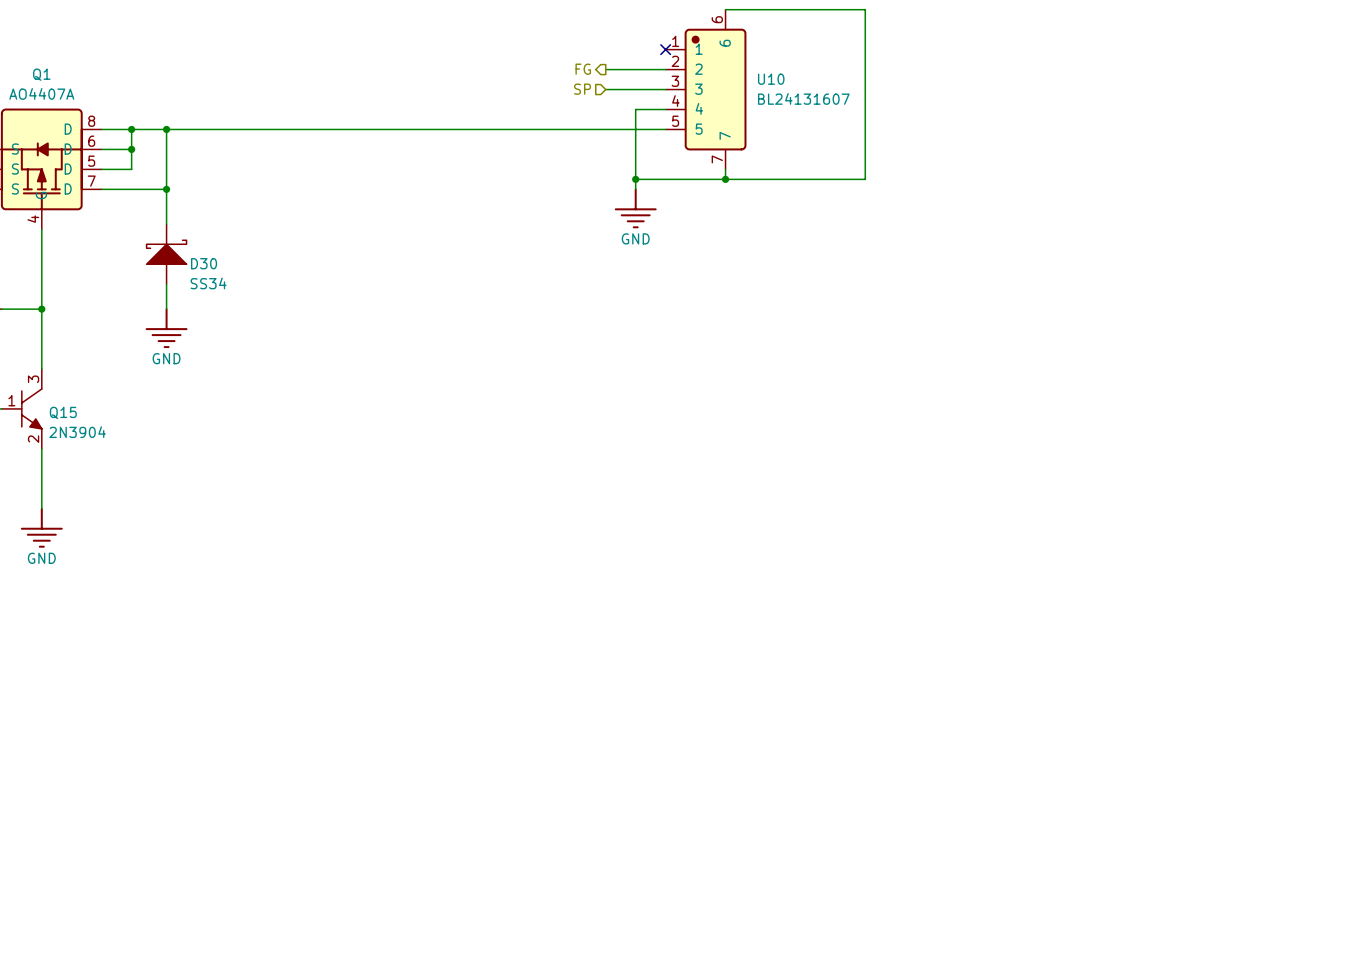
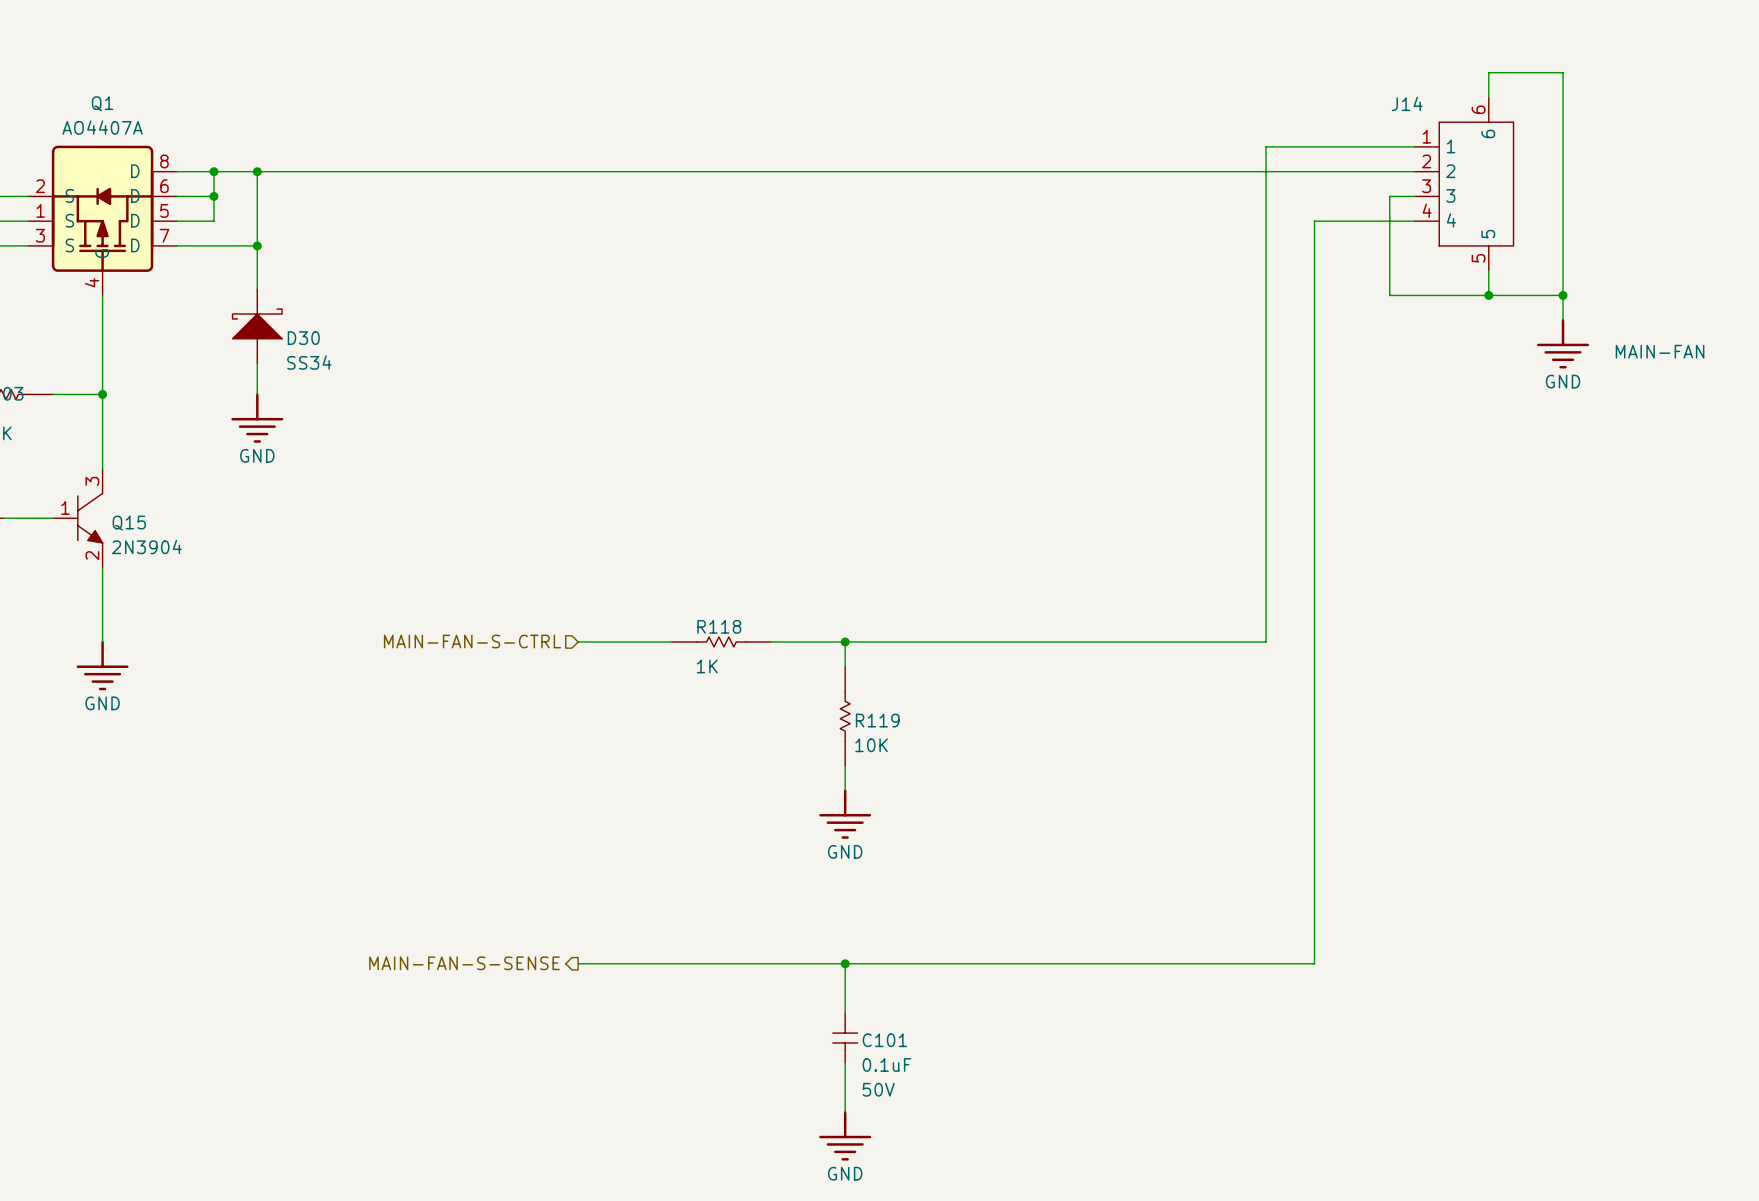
wire: (725, 9) (865, 9) (865, 179) (635, 179) -> none
no-connect mark: (665, 49) -> none
hierarchical label: FG (583, 69) -> none
wire: (605, 69) (665, 69) -> none
wire: none -> (1488, 97) (1488, 72) (1563, 72) (1563, 320)
hierarchical label: SP (582, 89) -> none
wire: (605, 89) (665, 89) -> none
U10: BL24131607 (706, 89) -> none
wire: (665, 109) (635, 109) (635, 189) -> none
wire: none -> (1414, 146) (1265, 146) (1265, 641) (770, 641)
wire: none -> (876, 171) (1414, 171)
J14: none -> MAIN-FAN (1464, 184)
wire: none -> (1414, 196) (1389, 196) (1389, 295) (1563, 295)
wire: (725, 169) (725, 179) -> none
wire: none -> (1414, 221) (1314, 221) (1314, 963) (578, 963)
junction: (635, 179) -> none
junction: (725, 179) -> none
power symbol: GND (635, 208) -> none
wire: none -> (1488, 270) (1488, 295)
junction: none -> (1488, 295)
junction: none -> (1563, 295)
power symbol: none -> GND (1563, 343)
hierarchical label: none -> MAIN-FAN-S-CTRL (472, 641)
wire: none -> (578, 641) (671, 641)
R118: none -> 1K (721, 641)
wire: none -> (845, 641) (845, 666)
junction: none -> (845, 641)
R119: none -> 10K (845, 716)
wire: none -> (845, 765) (845, 790)
power symbol: none -> GND (845, 814)
hierarchical label: none -> MAIN-FAN-S-SENSE (464, 963)
wire: none -> (845, 963) (845, 1013)
junction: none -> (845, 963)
C101: none -> 0.1uF (845, 1038)
wire: none -> (845, 1062) (845, 1112)
power symbol: none -> GND (845, 1135)

